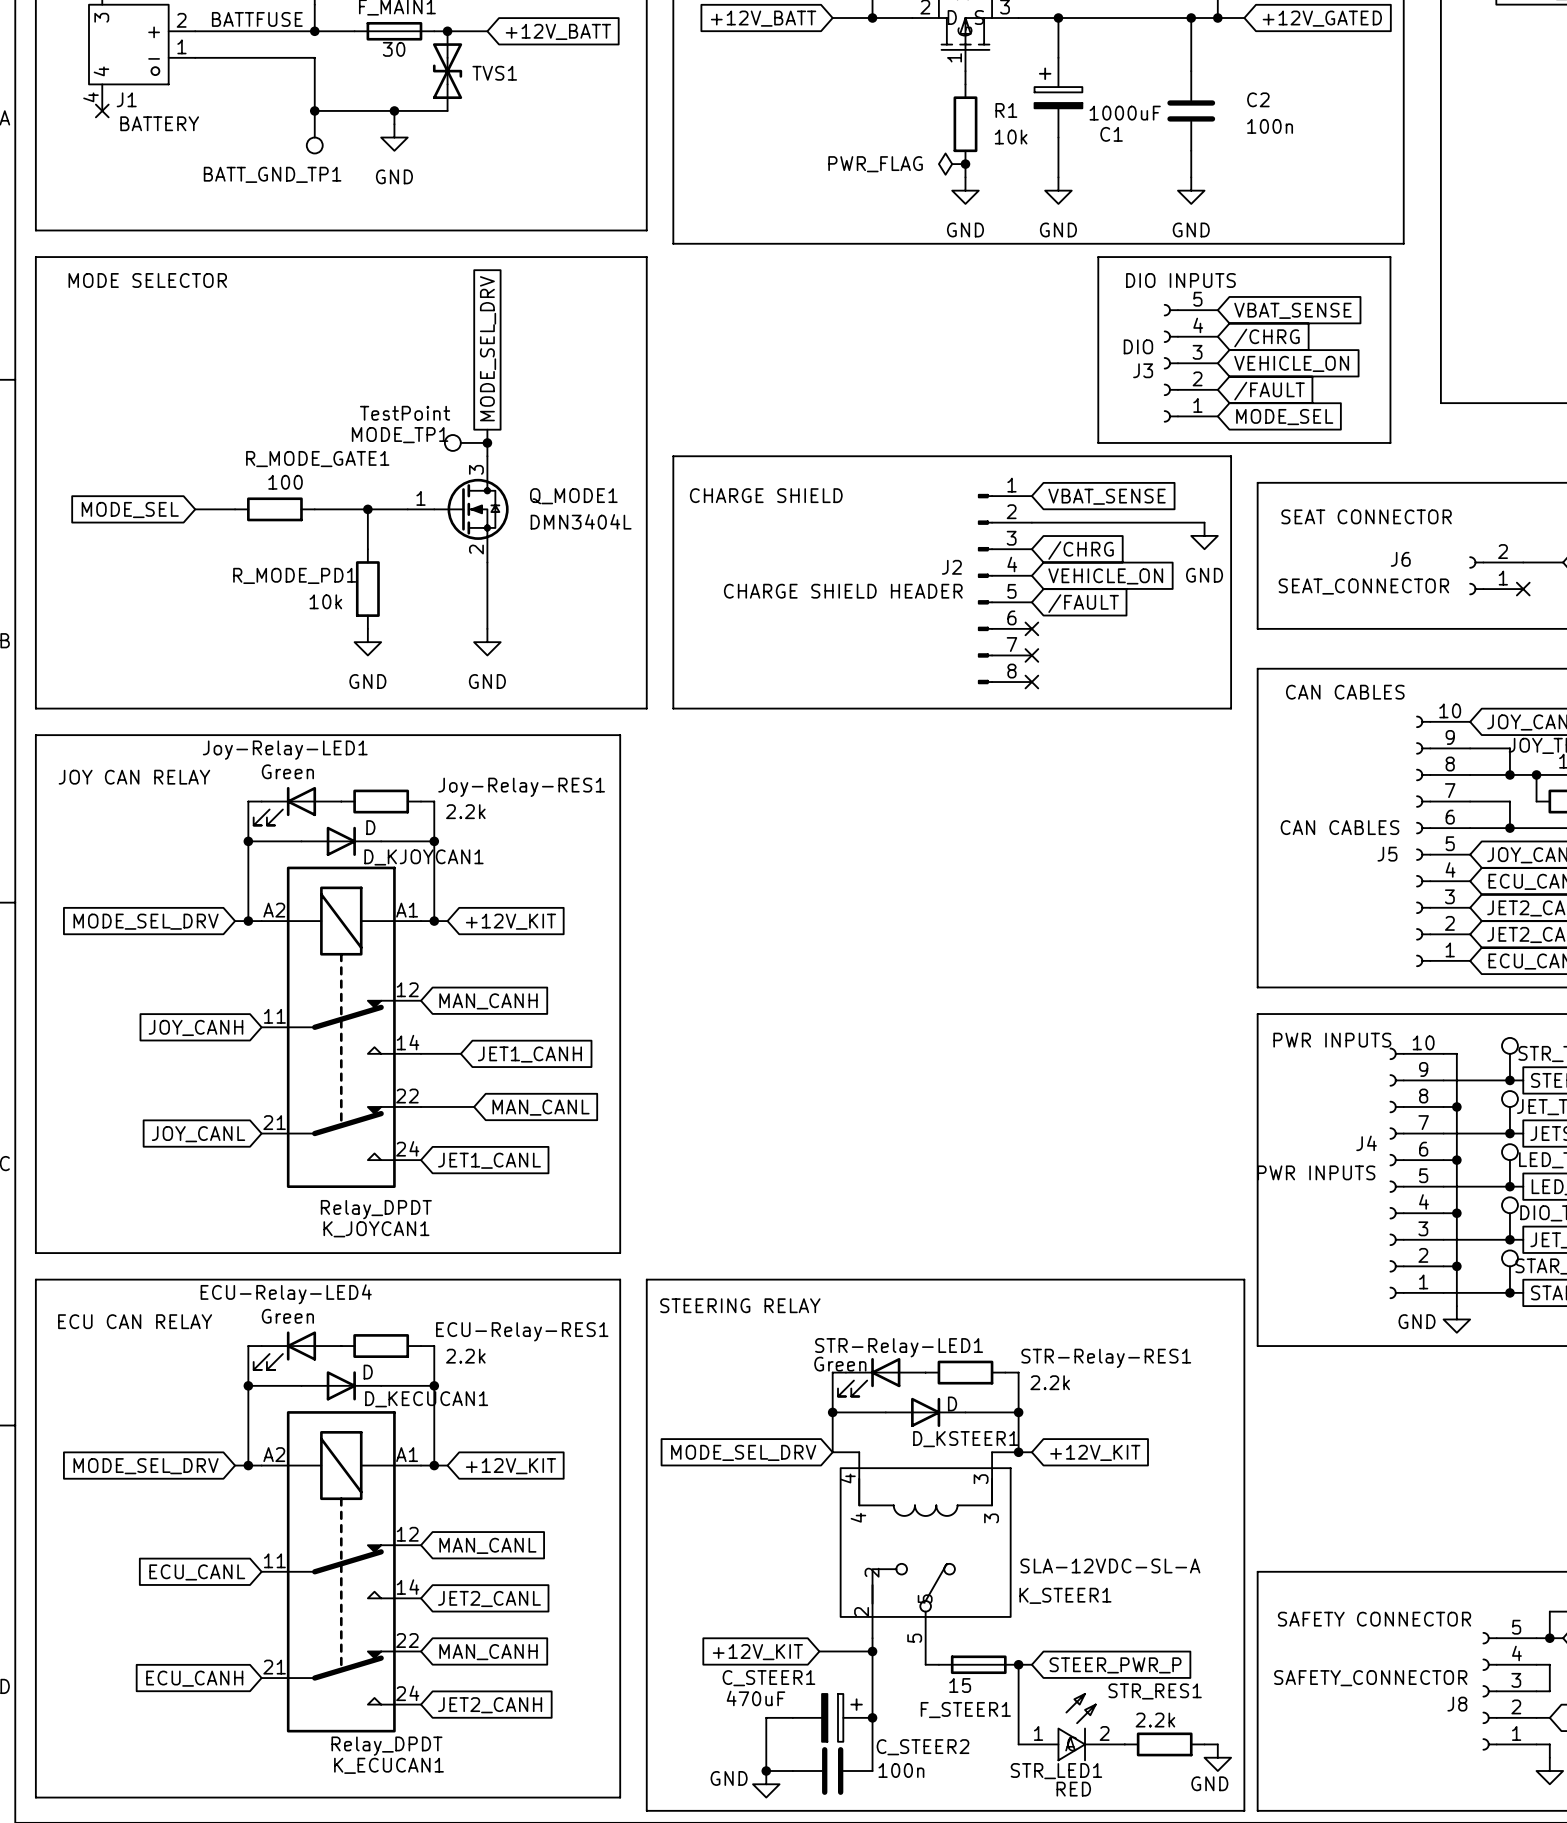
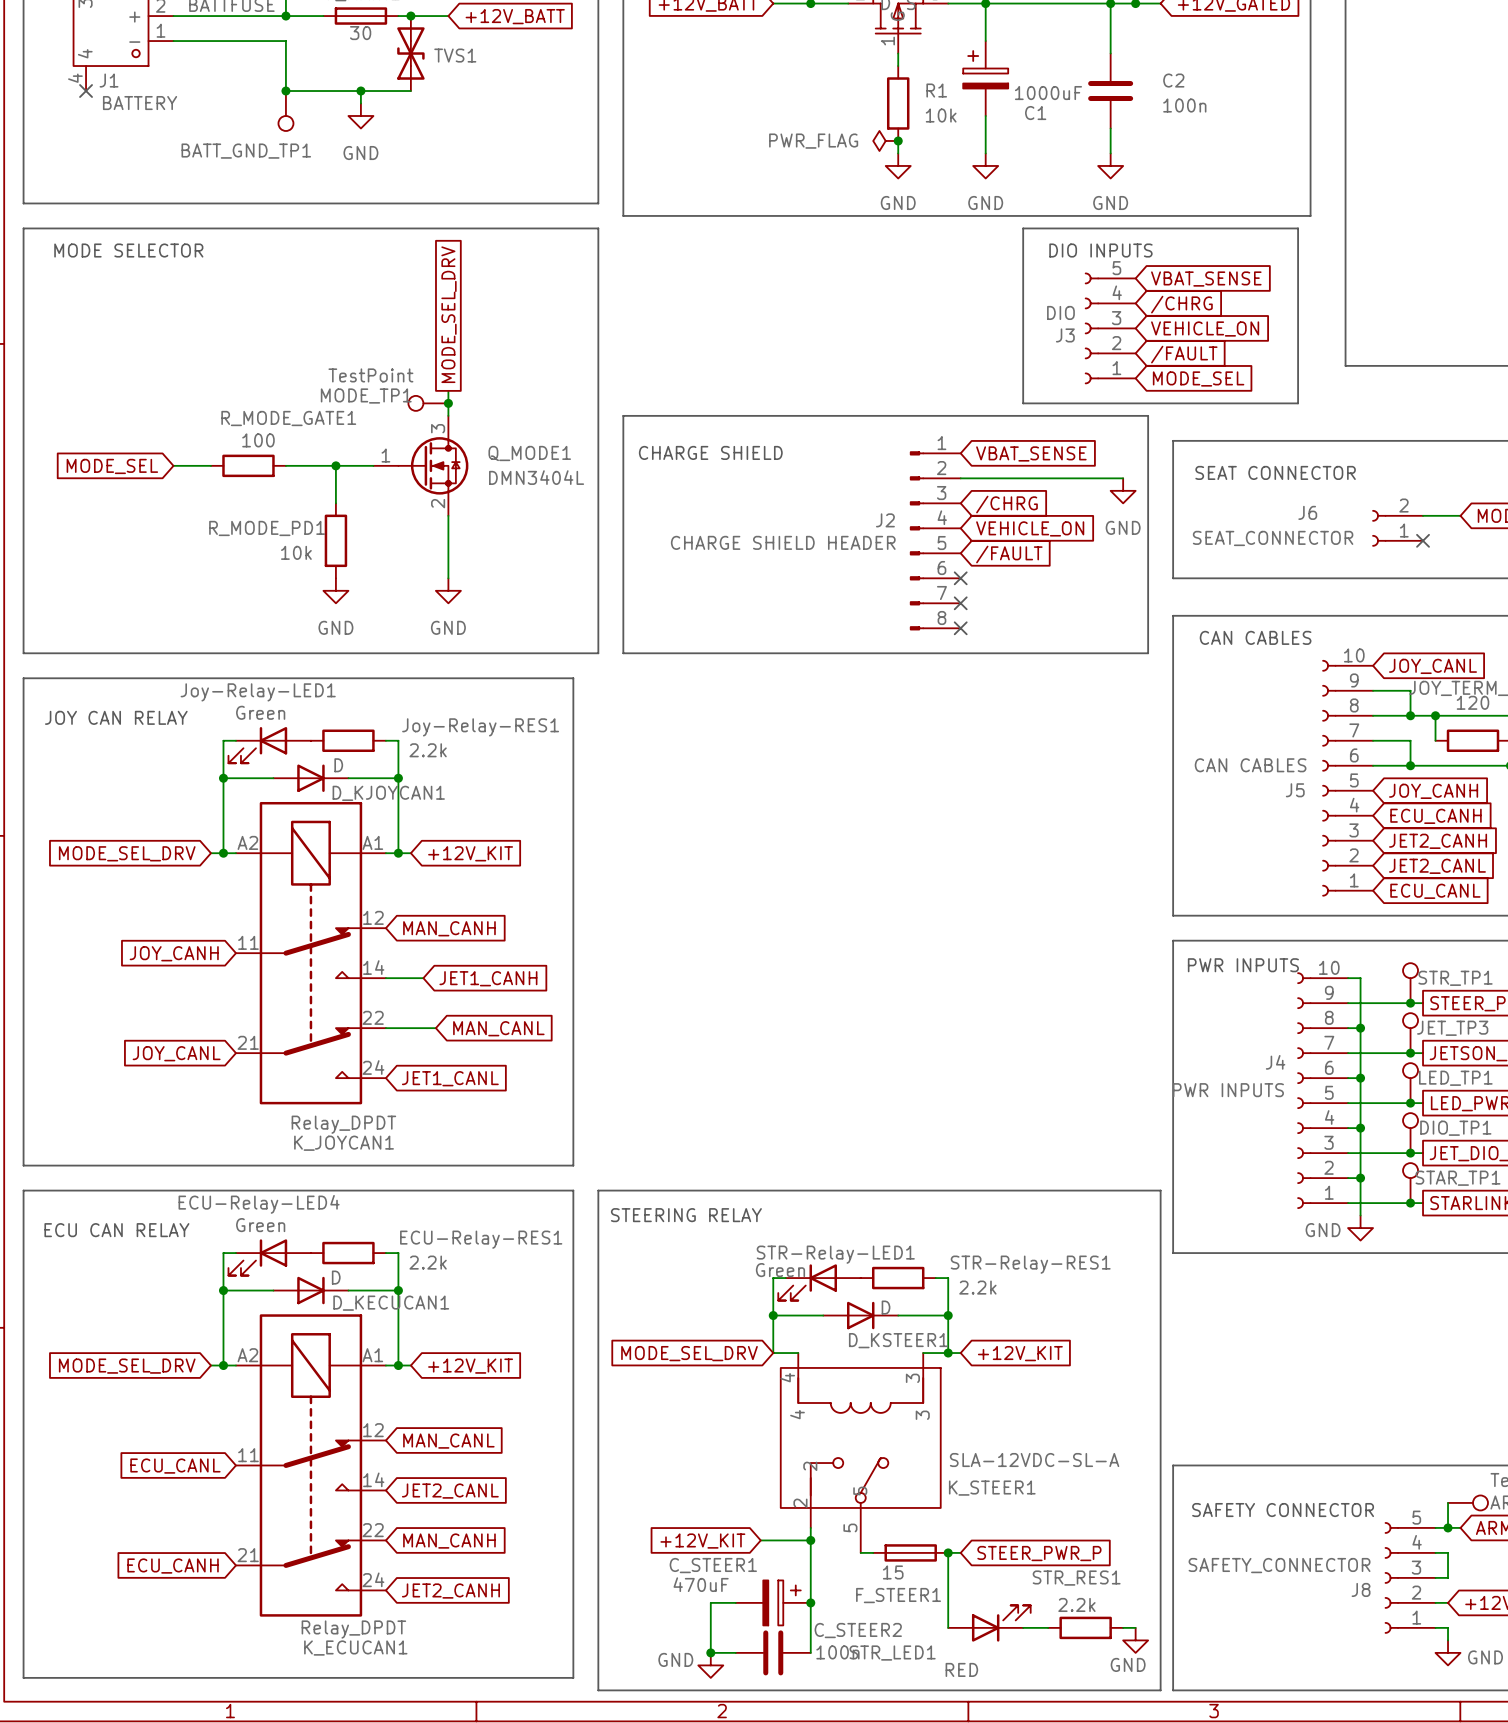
STR_LED1 symbol: [1018, 1693, 1125, 1761] -> [948, 1605, 1031, 1642]
STR_LED1 name position: STR_LED1 (1056, 1771) -> STR_LED1 (892, 1653)
STR_LED1 value position: RED (1073, 1789) -> RED (961, 1669)

